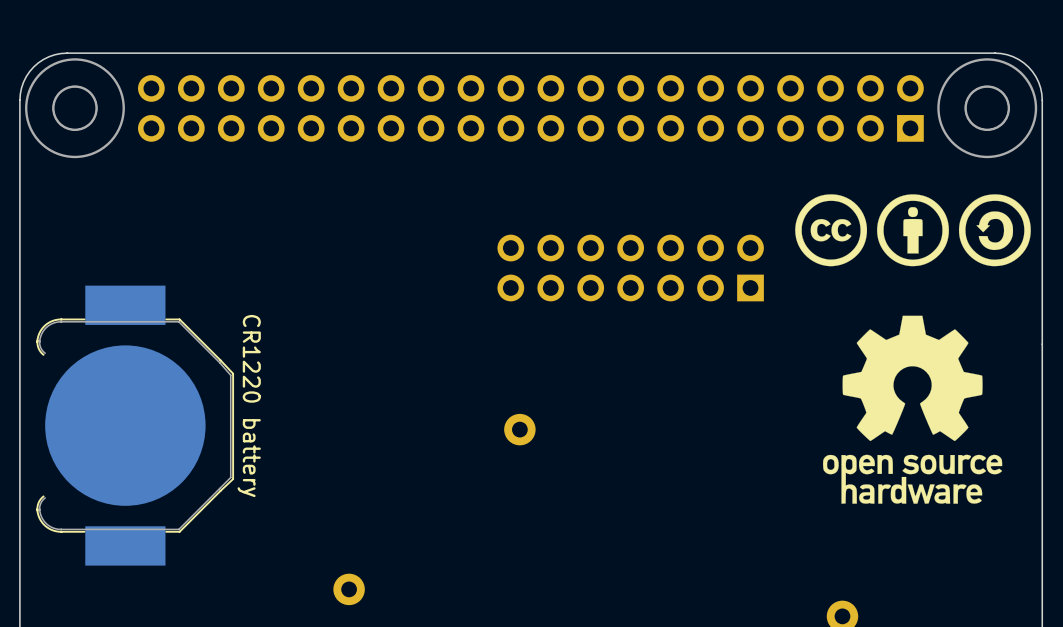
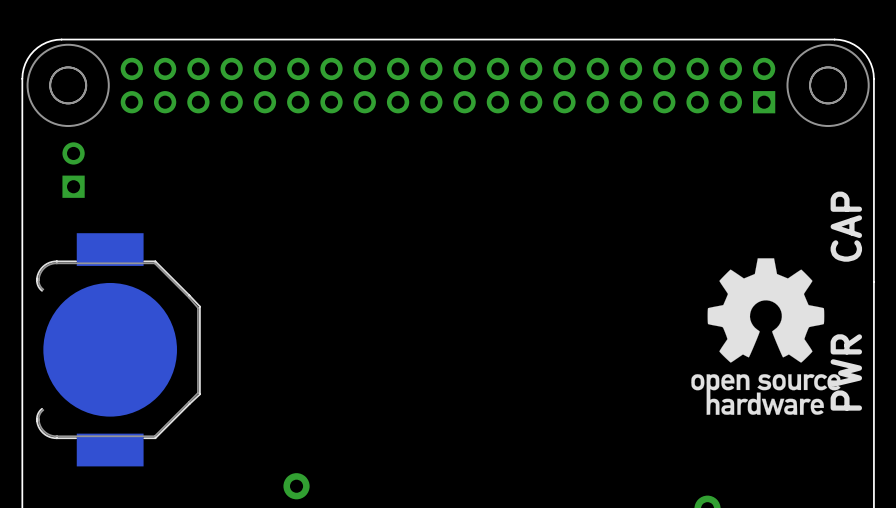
drawing: [795, 194, 1031, 267] -> none
part: none -> (73, 170)
part: (630, 268) -> none
text: none -> CAP (846, 226)
text: CR1220 battery (249, 406) -> none
part: (519, 429) -> none
text: none -> PWR (846, 372)

